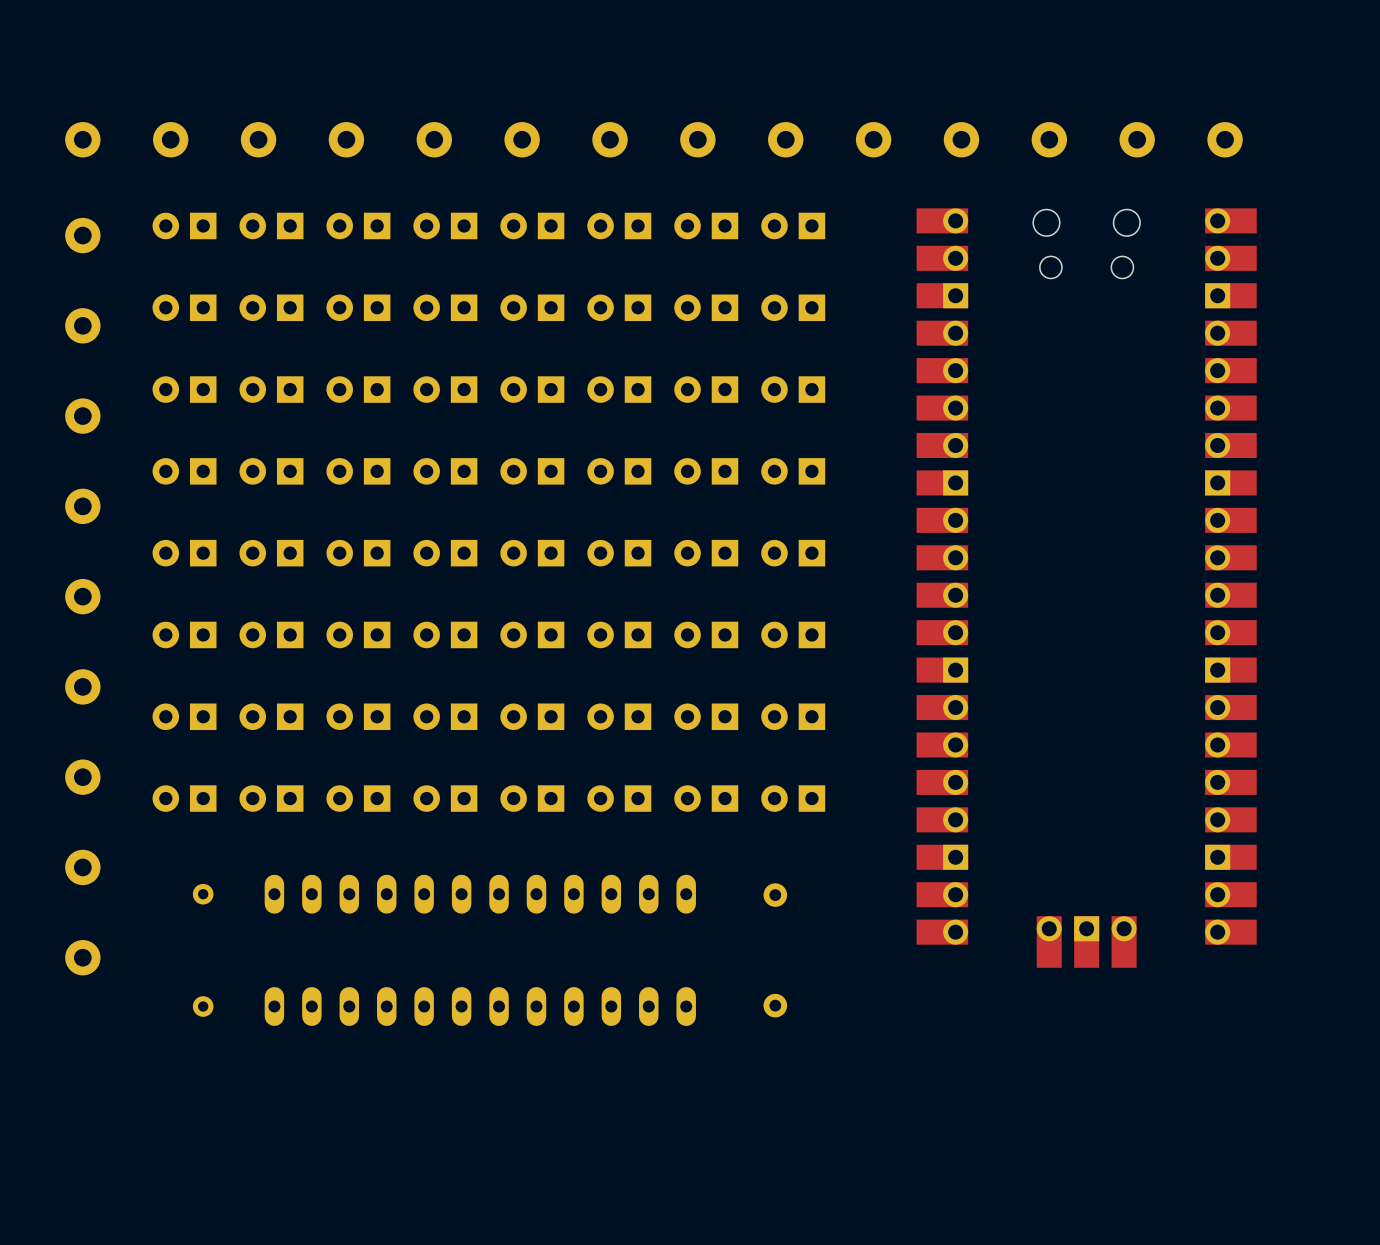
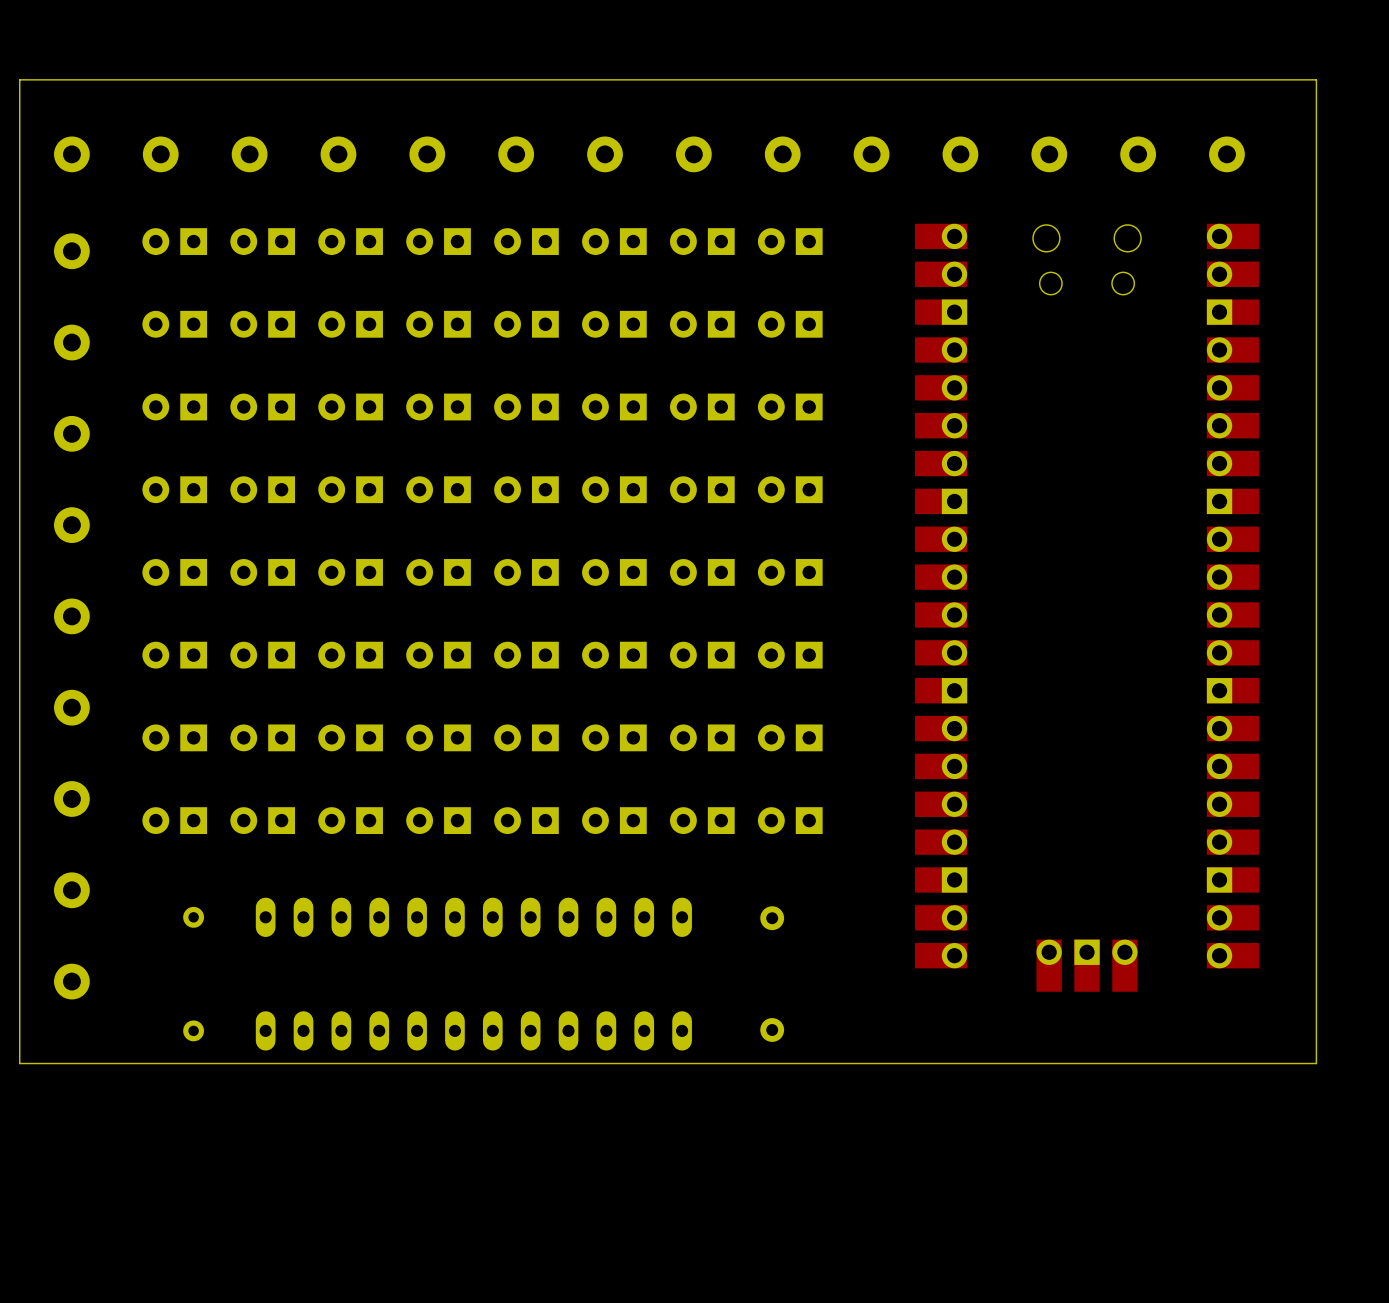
board edge: none -> (1316, 79) (19, 79) (19, 1063) (1316, 1063) (1316, 79)

